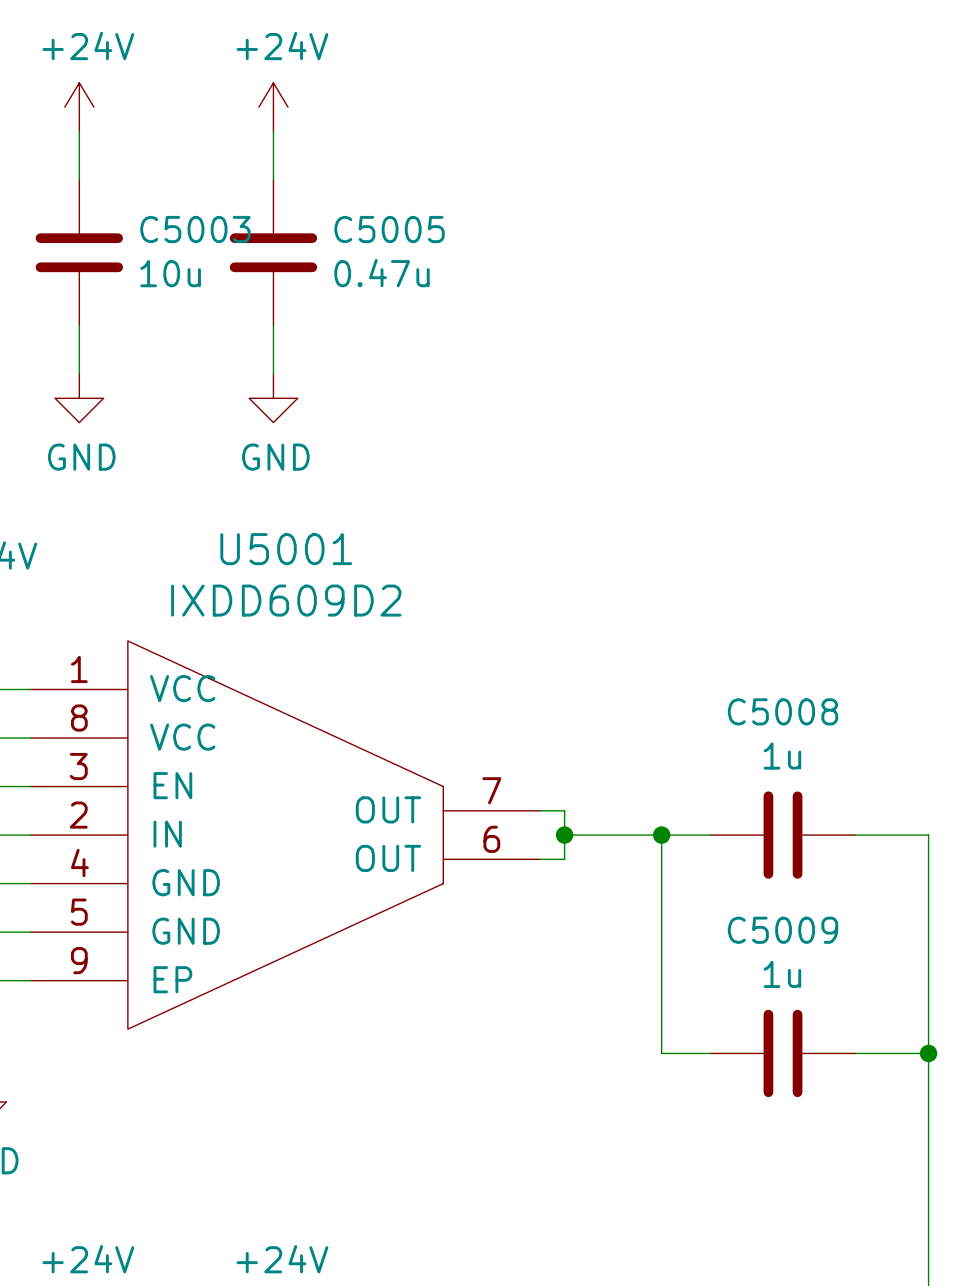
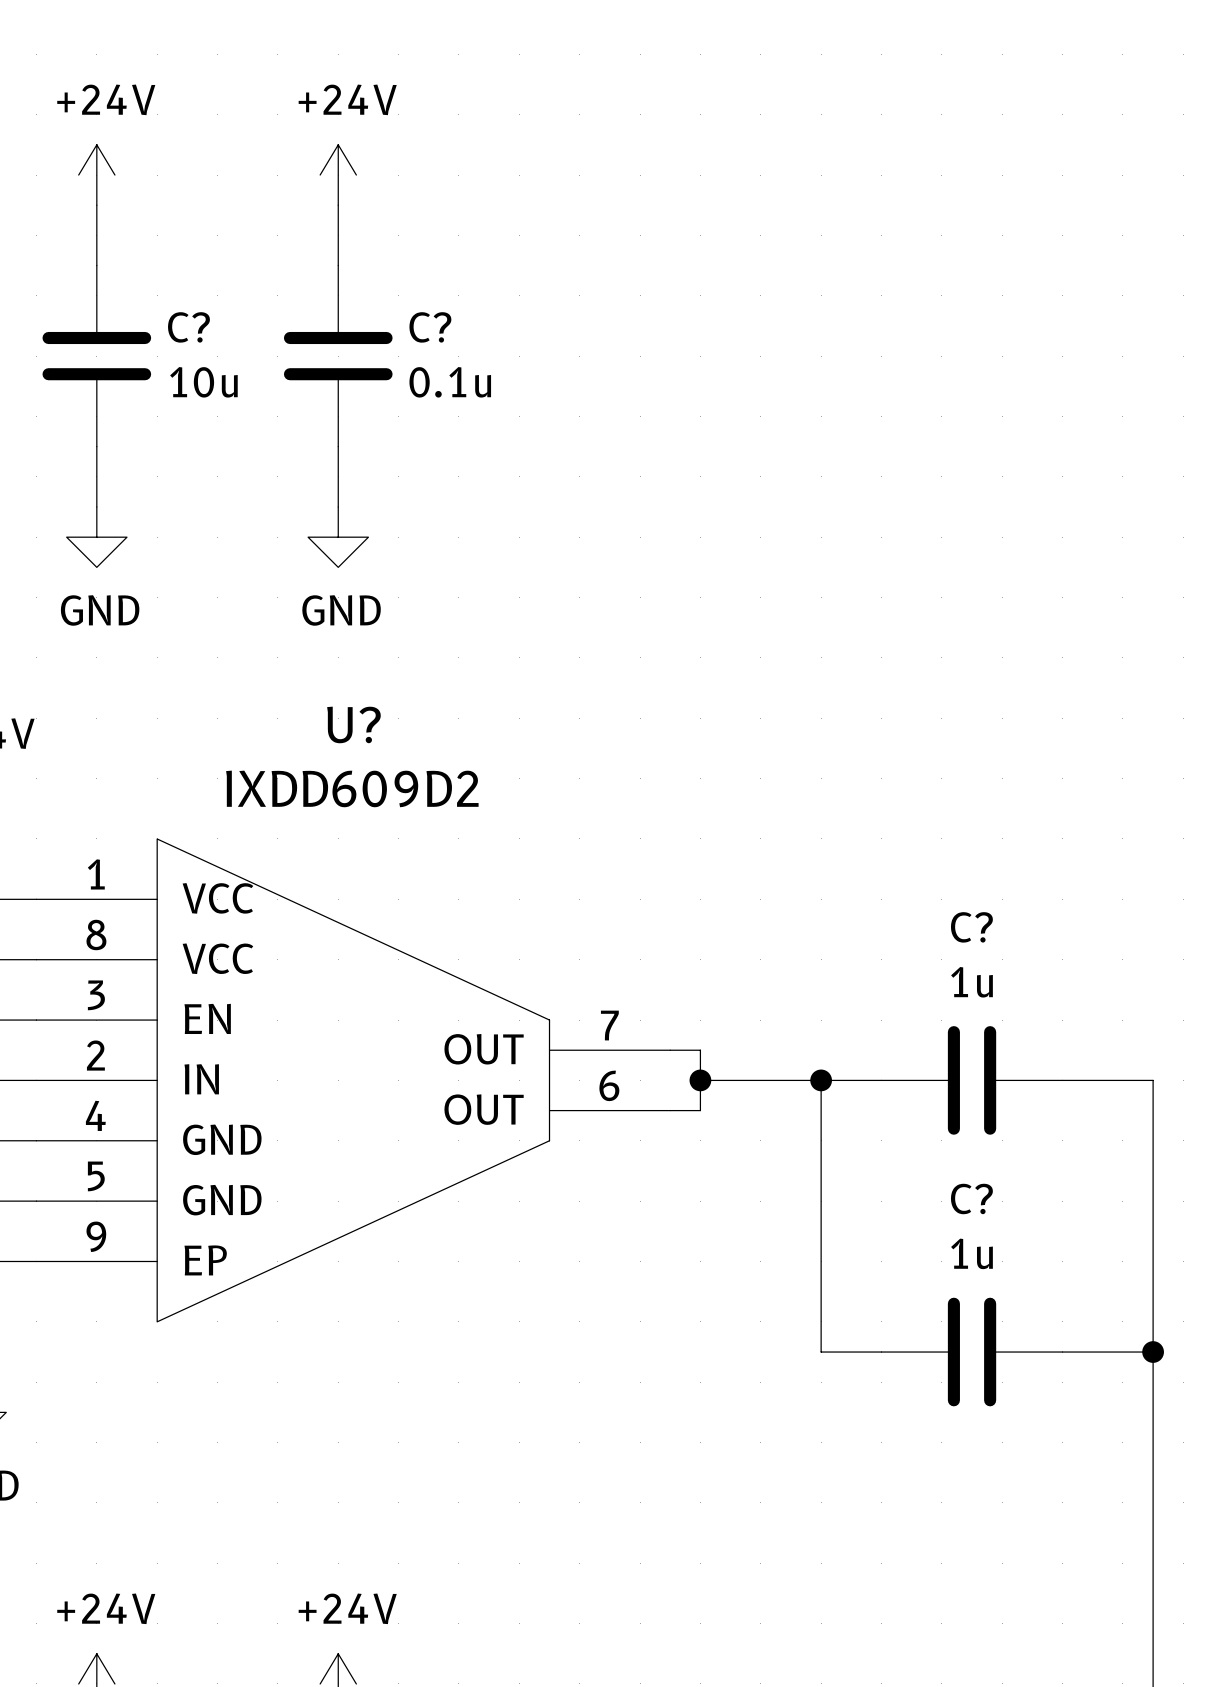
C5003 name: C5003 (195, 229) -> C? (188, 327)
C5005 name: C5005 (389, 229) -> C? (430, 327)
C5005 value: 0.47u (382, 273) -> 0.1u (450, 382)
U5001 name: U5001 (286, 549) -> U? (353, 724)
C5008 name: C5008 (782, 711) -> C? (971, 927)
C5009 name: C5009 (782, 930) -> C? (971, 1198)

